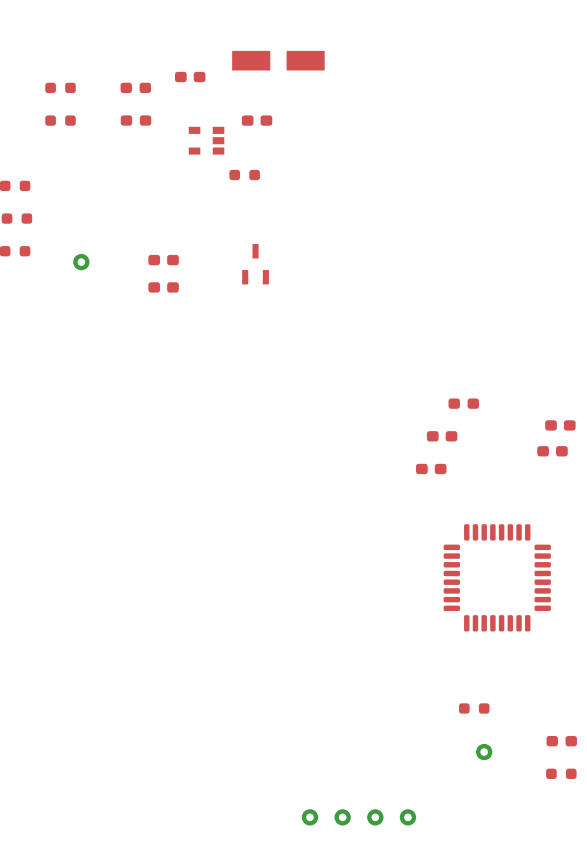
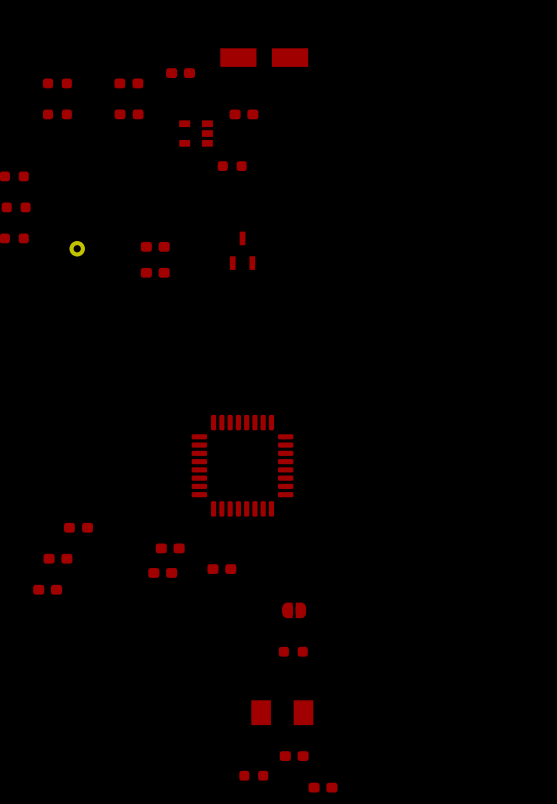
part: (463, 403) -> none
part: (560, 425) -> none
part: (442, 436) -> none
part: (552, 451) -> none
part: (431, 468) -> none
part: none -> (78, 527)
part: none -> (170, 548)
part position: (497, 577) -> (242, 465)
part: none -> (57, 558)
part: none -> (221, 569)
part: none -> (162, 572)
part: none -> (47, 589)
part: none -> (294, 610)
part: none -> (293, 651)
part: (474, 708) -> none
part: (561, 741) -> none
part: none -> (282, 712)
part: (484, 752) -> none
part: (561, 773) -> none
part: none -> (294, 756)
part: none -> (253, 775)
part: (309, 817) -> none
part: (342, 817) -> none
part: (375, 817) -> none
part: (407, 817) -> none
part: none -> (323, 787)

